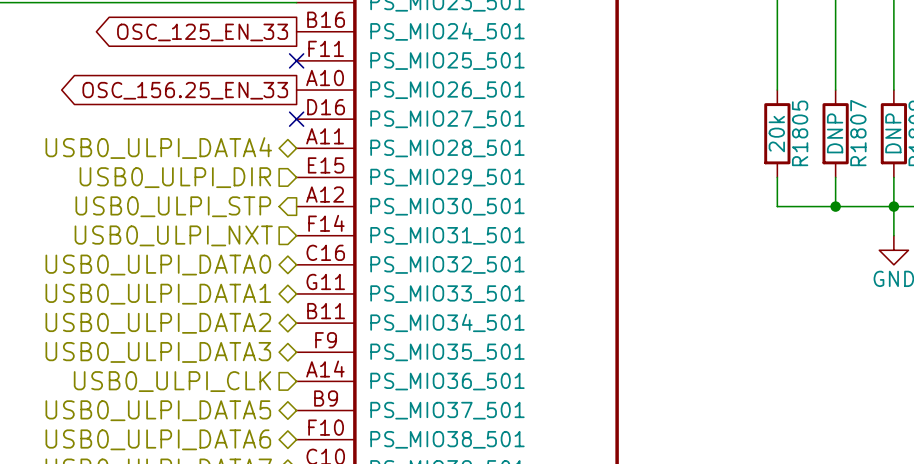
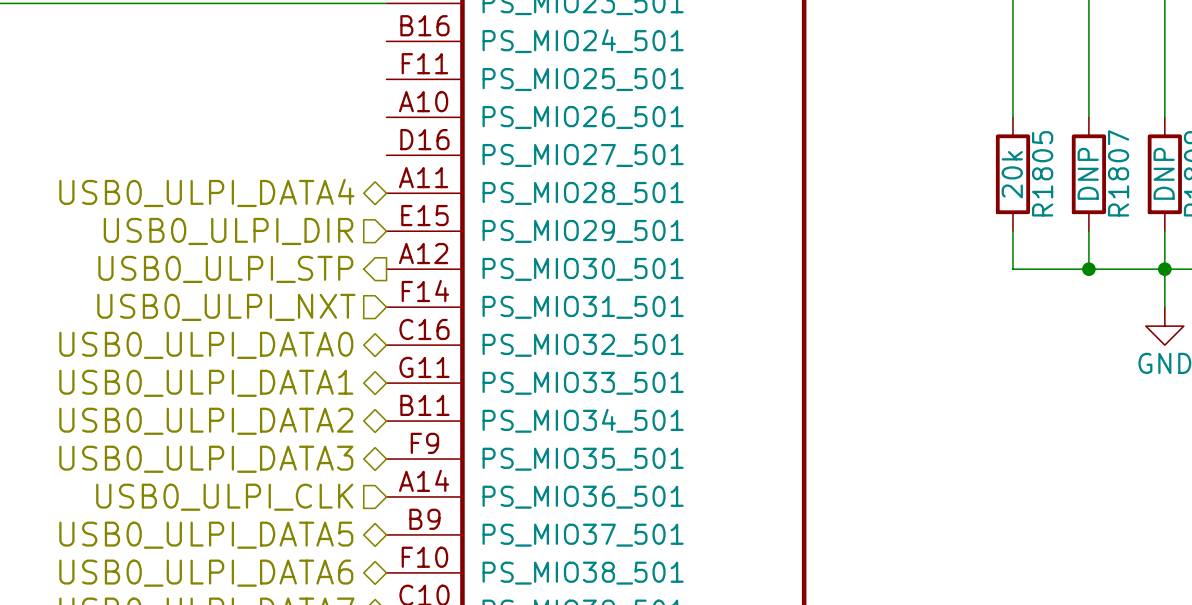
global label: OSC_125_EN_33 (202, 32) -> none
no-connect mark: (296, 60) -> none
global label: OSC_156.25_EN_33 (185, 90) -> none
no-connect mark: (296, 119) -> none

